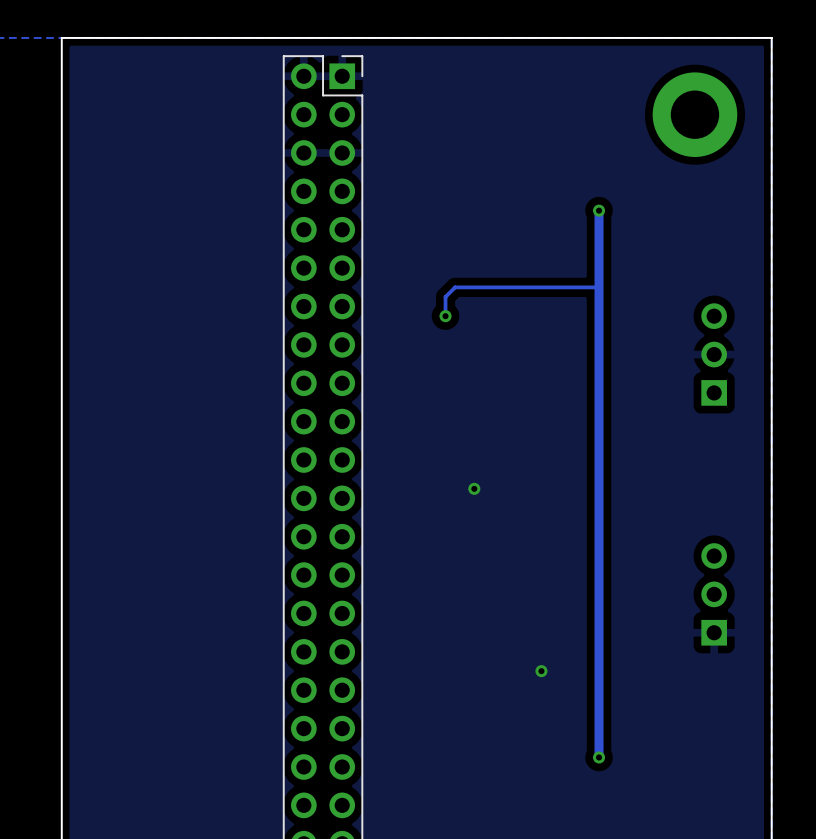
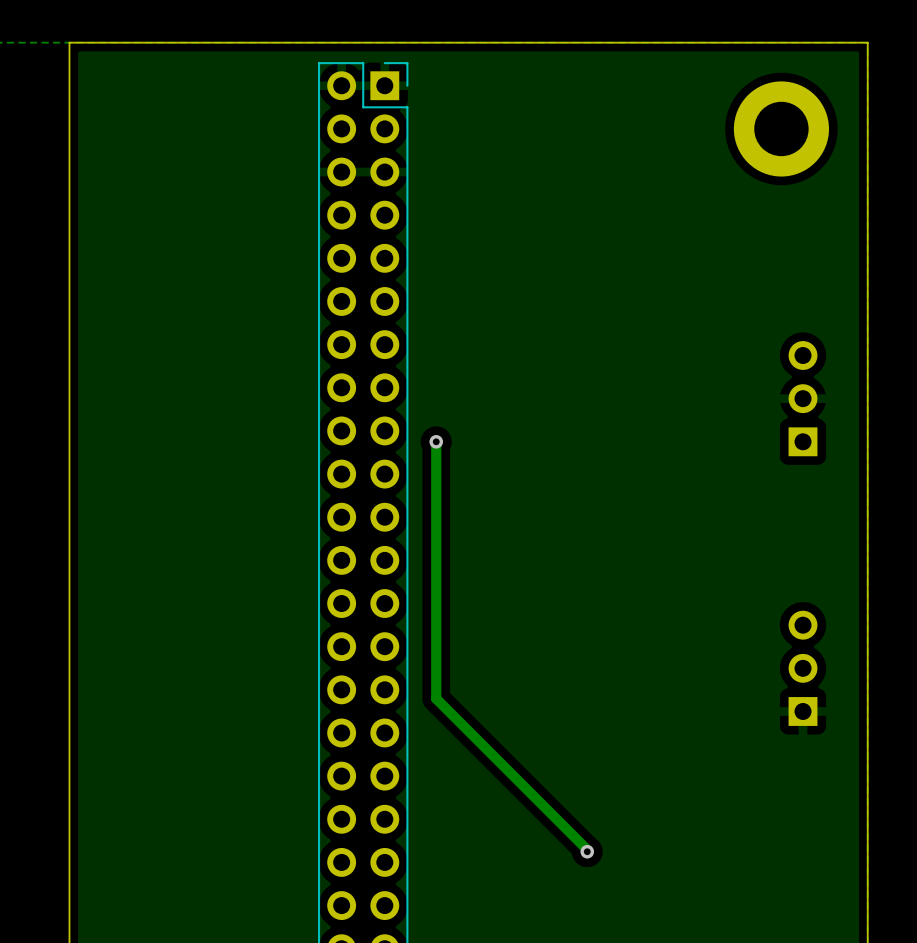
track: (599, 210) (599, 757) -> none
via: (599, 210) -> none
track: (599, 287) (455, 287) (445, 296) (445, 316) -> none
via: (445, 316) -> none
track: none -> (436, 441) (436, 698) (587, 851)
via: none -> (436, 441)
via: (474, 488) -> none
via: (541, 671) -> none
via: none -> (587, 851)
via: (599, 757) -> none

